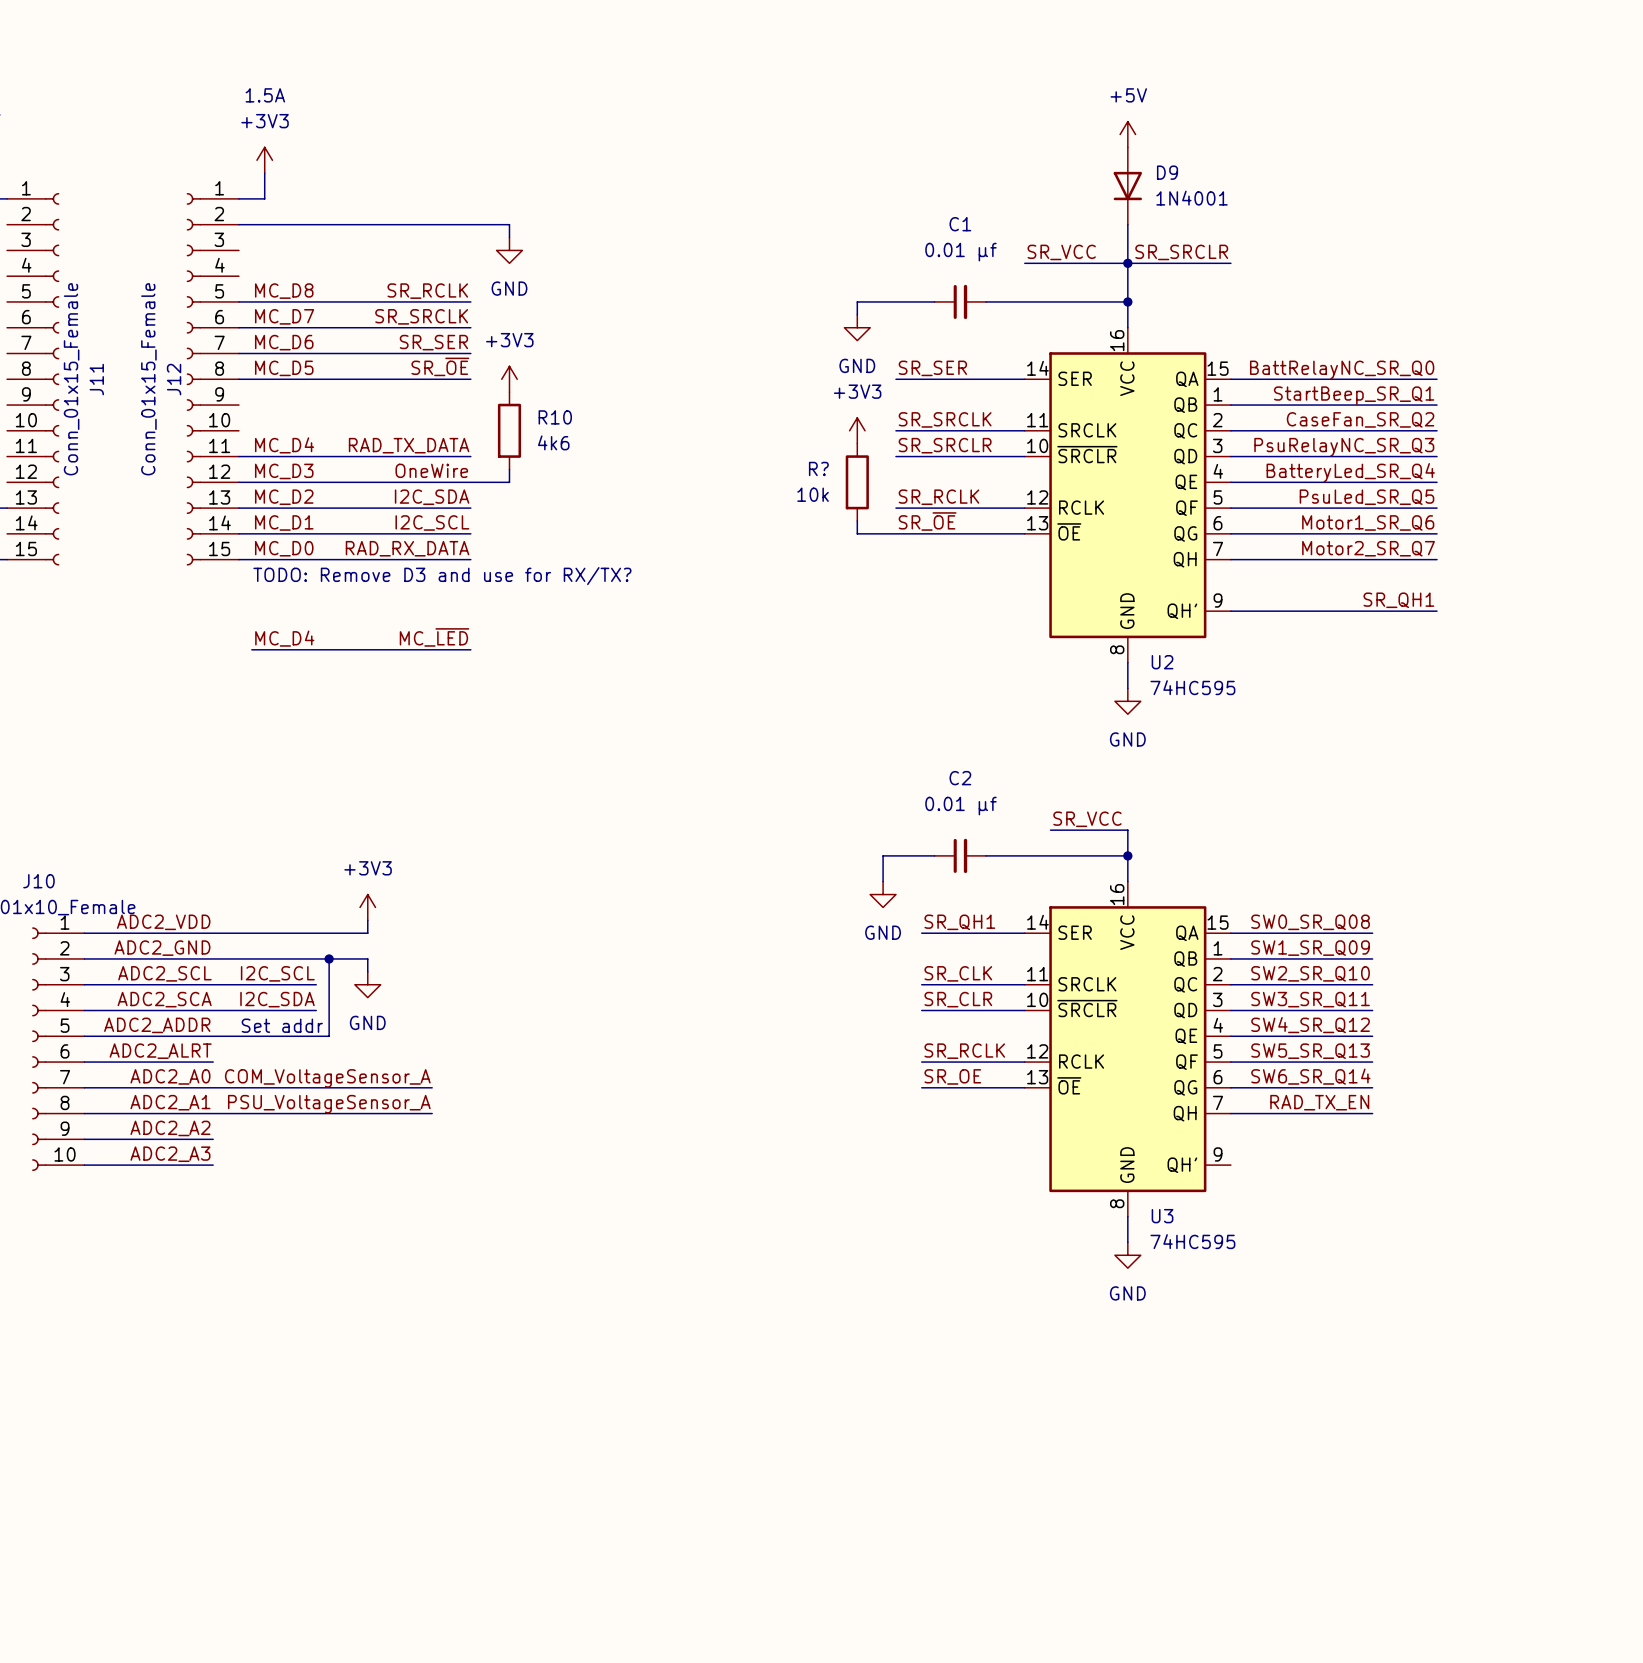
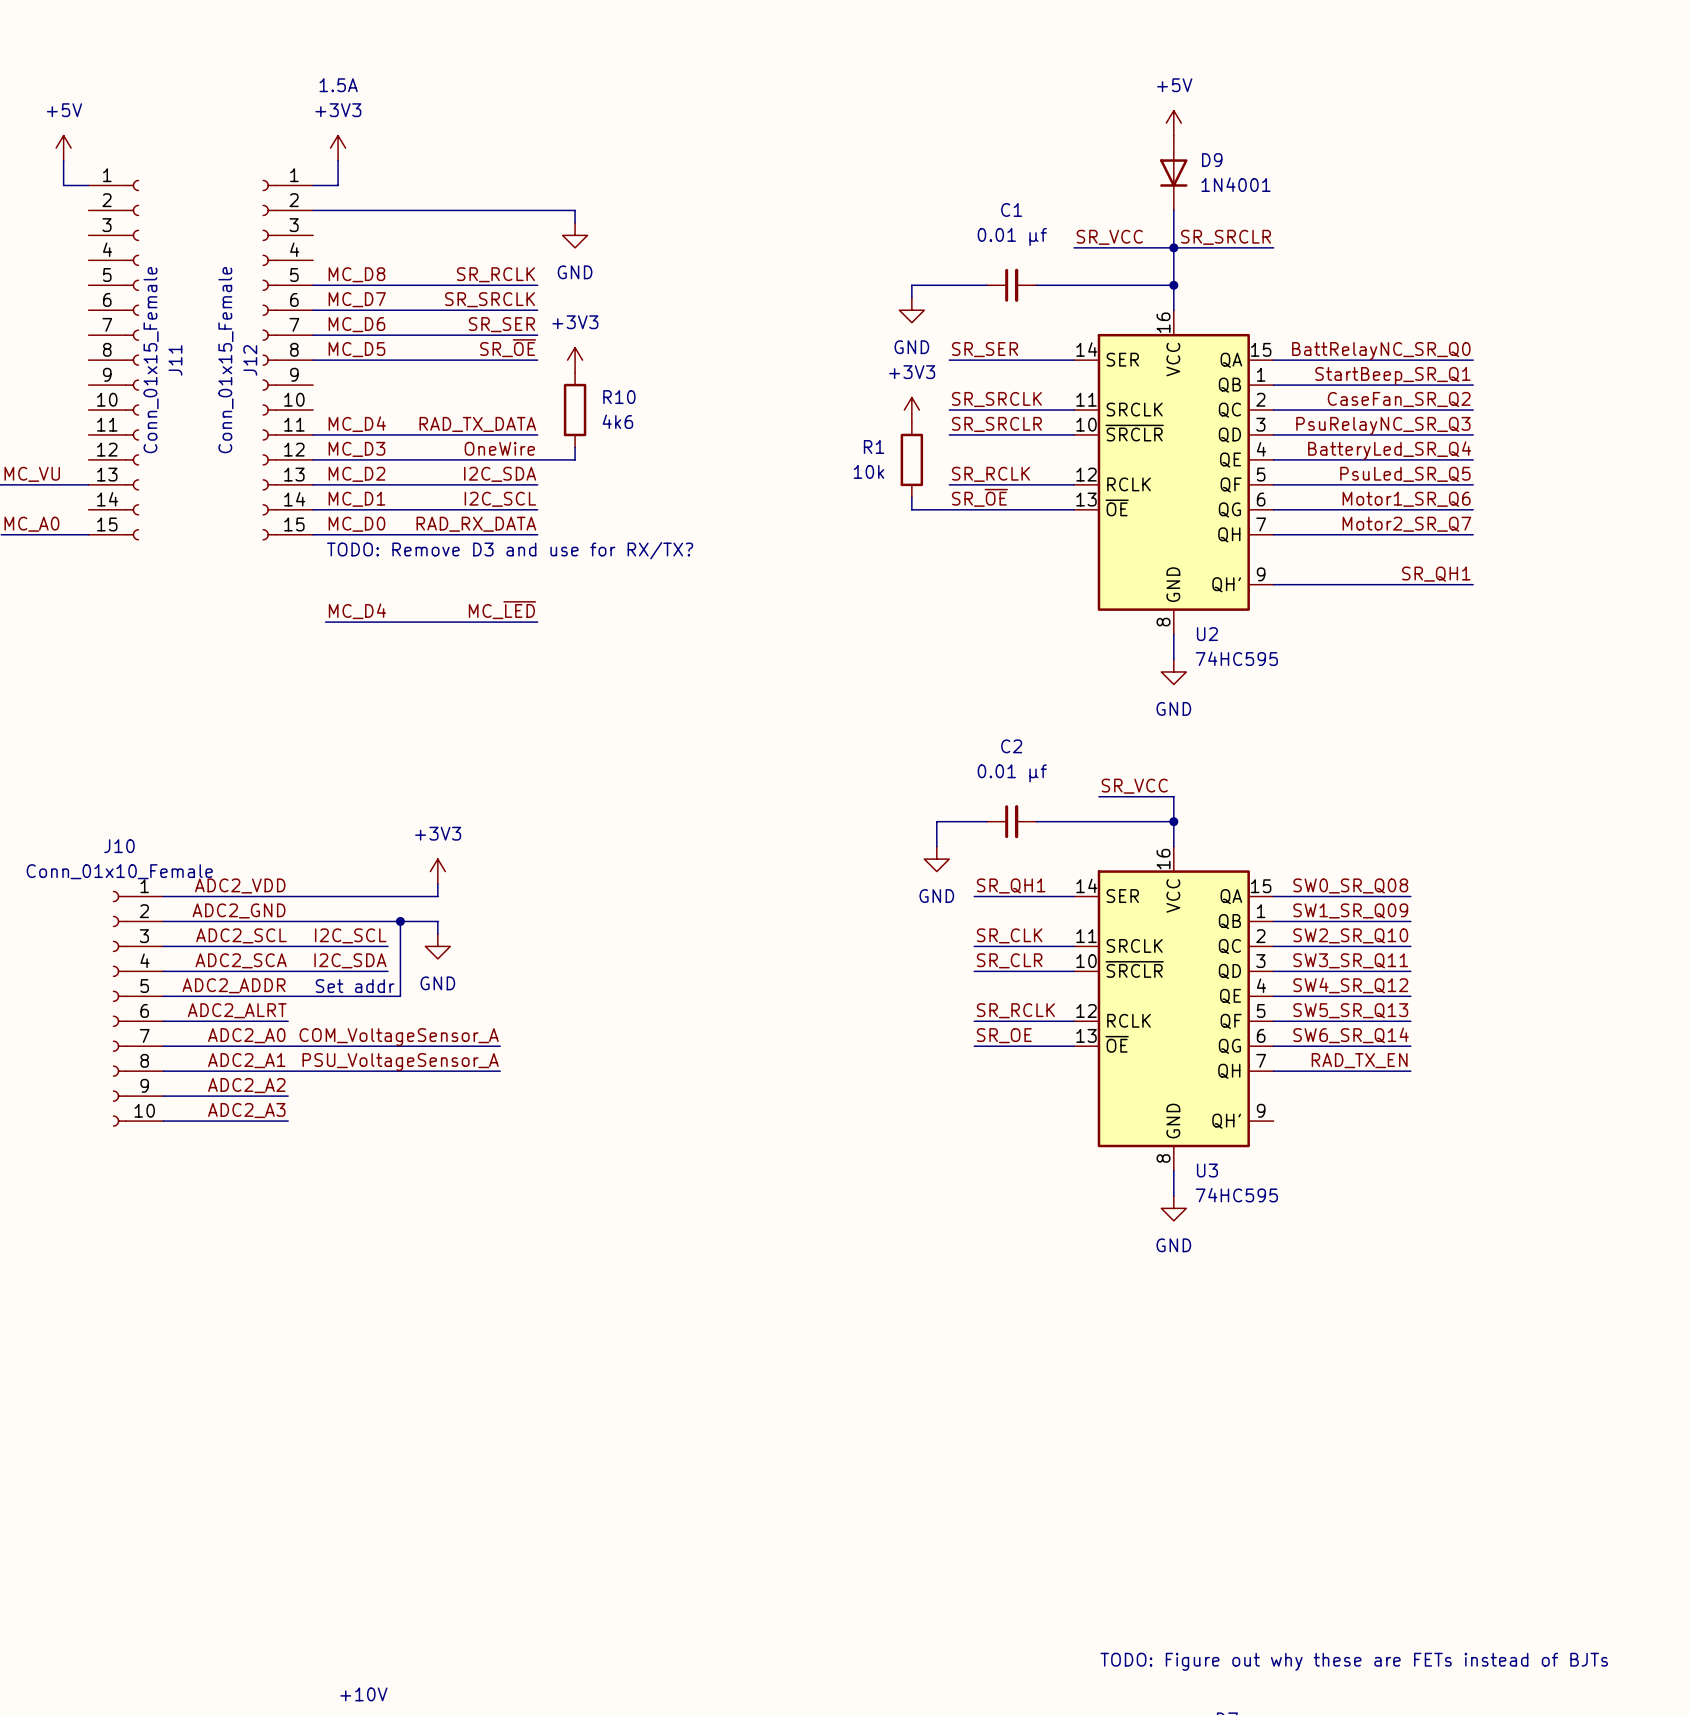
R? name: R? (818, 468) -> R1 (874, 446)

